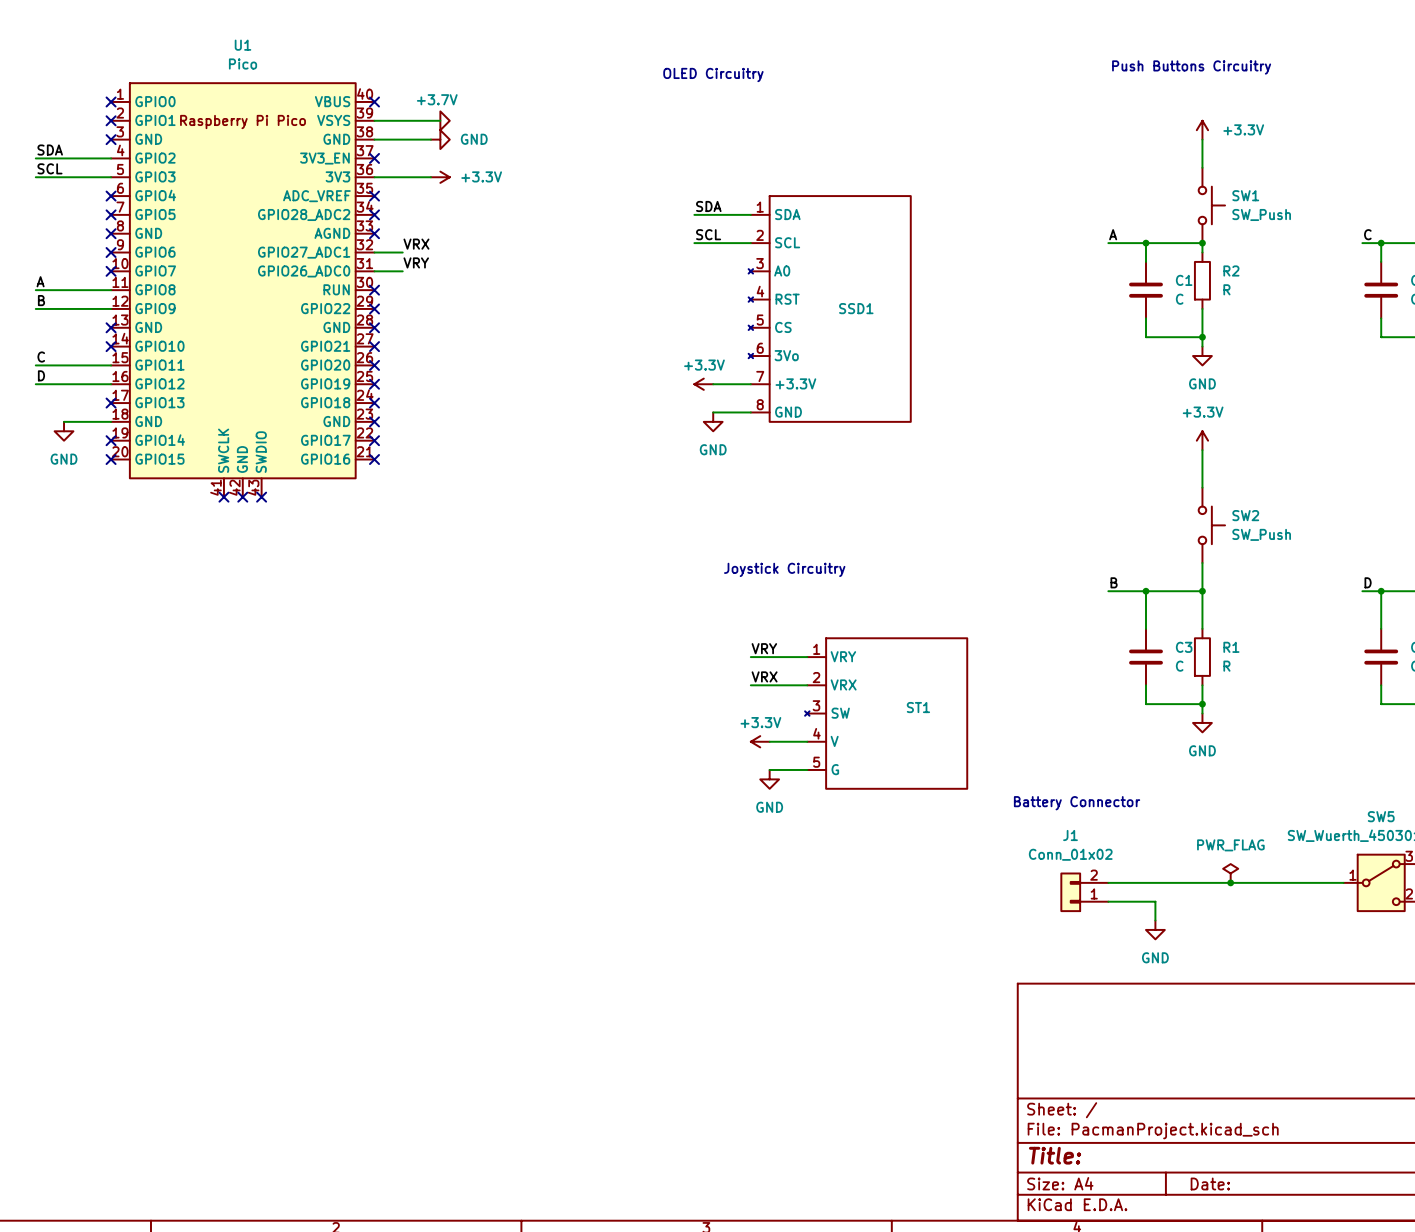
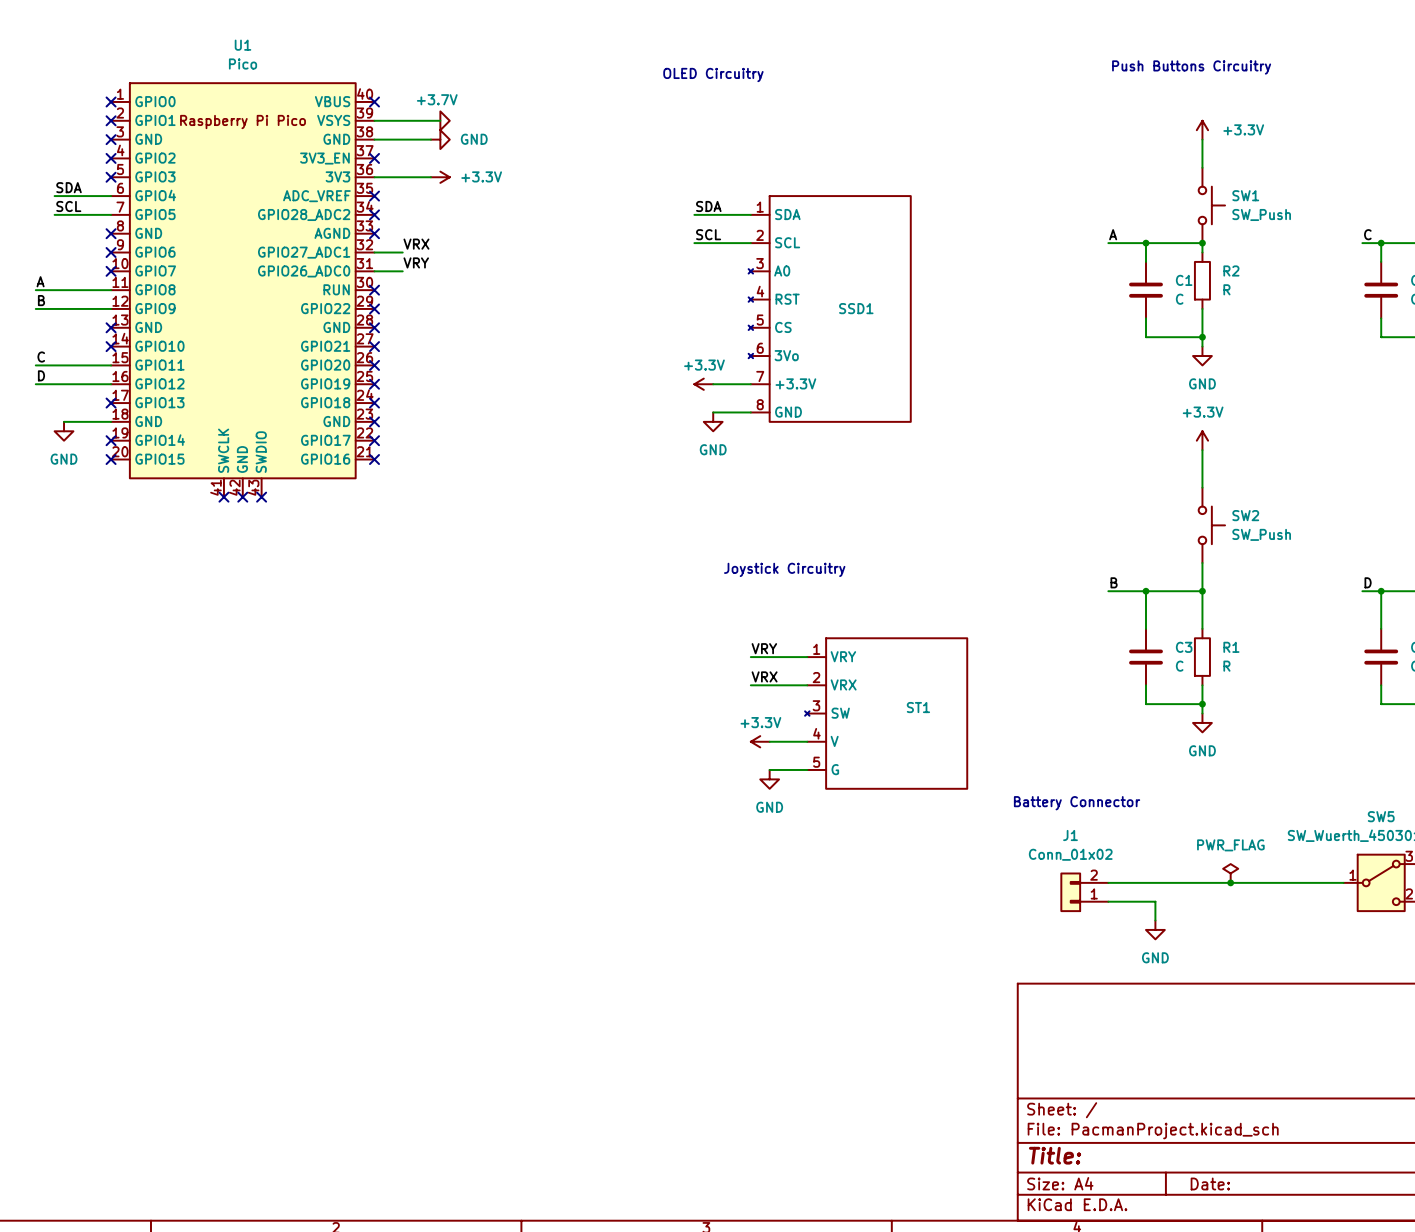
label position: SDA (50, 150) -> SDA (69, 187)
wire: (35, 158) (111, 158) -> none
no-connect mark: none -> (111, 158)
label position: SCL (49, 168) -> SCL (68, 206)
wire: (35, 177) (111, 177) -> none
no-connect mark: none -> (111, 177)
wire: none -> (54, 196) (111, 196)
no-connect mark: (111, 196) -> none
wire: none -> (54, 214) (111, 214)
no-connect mark: (111, 214) -> none

